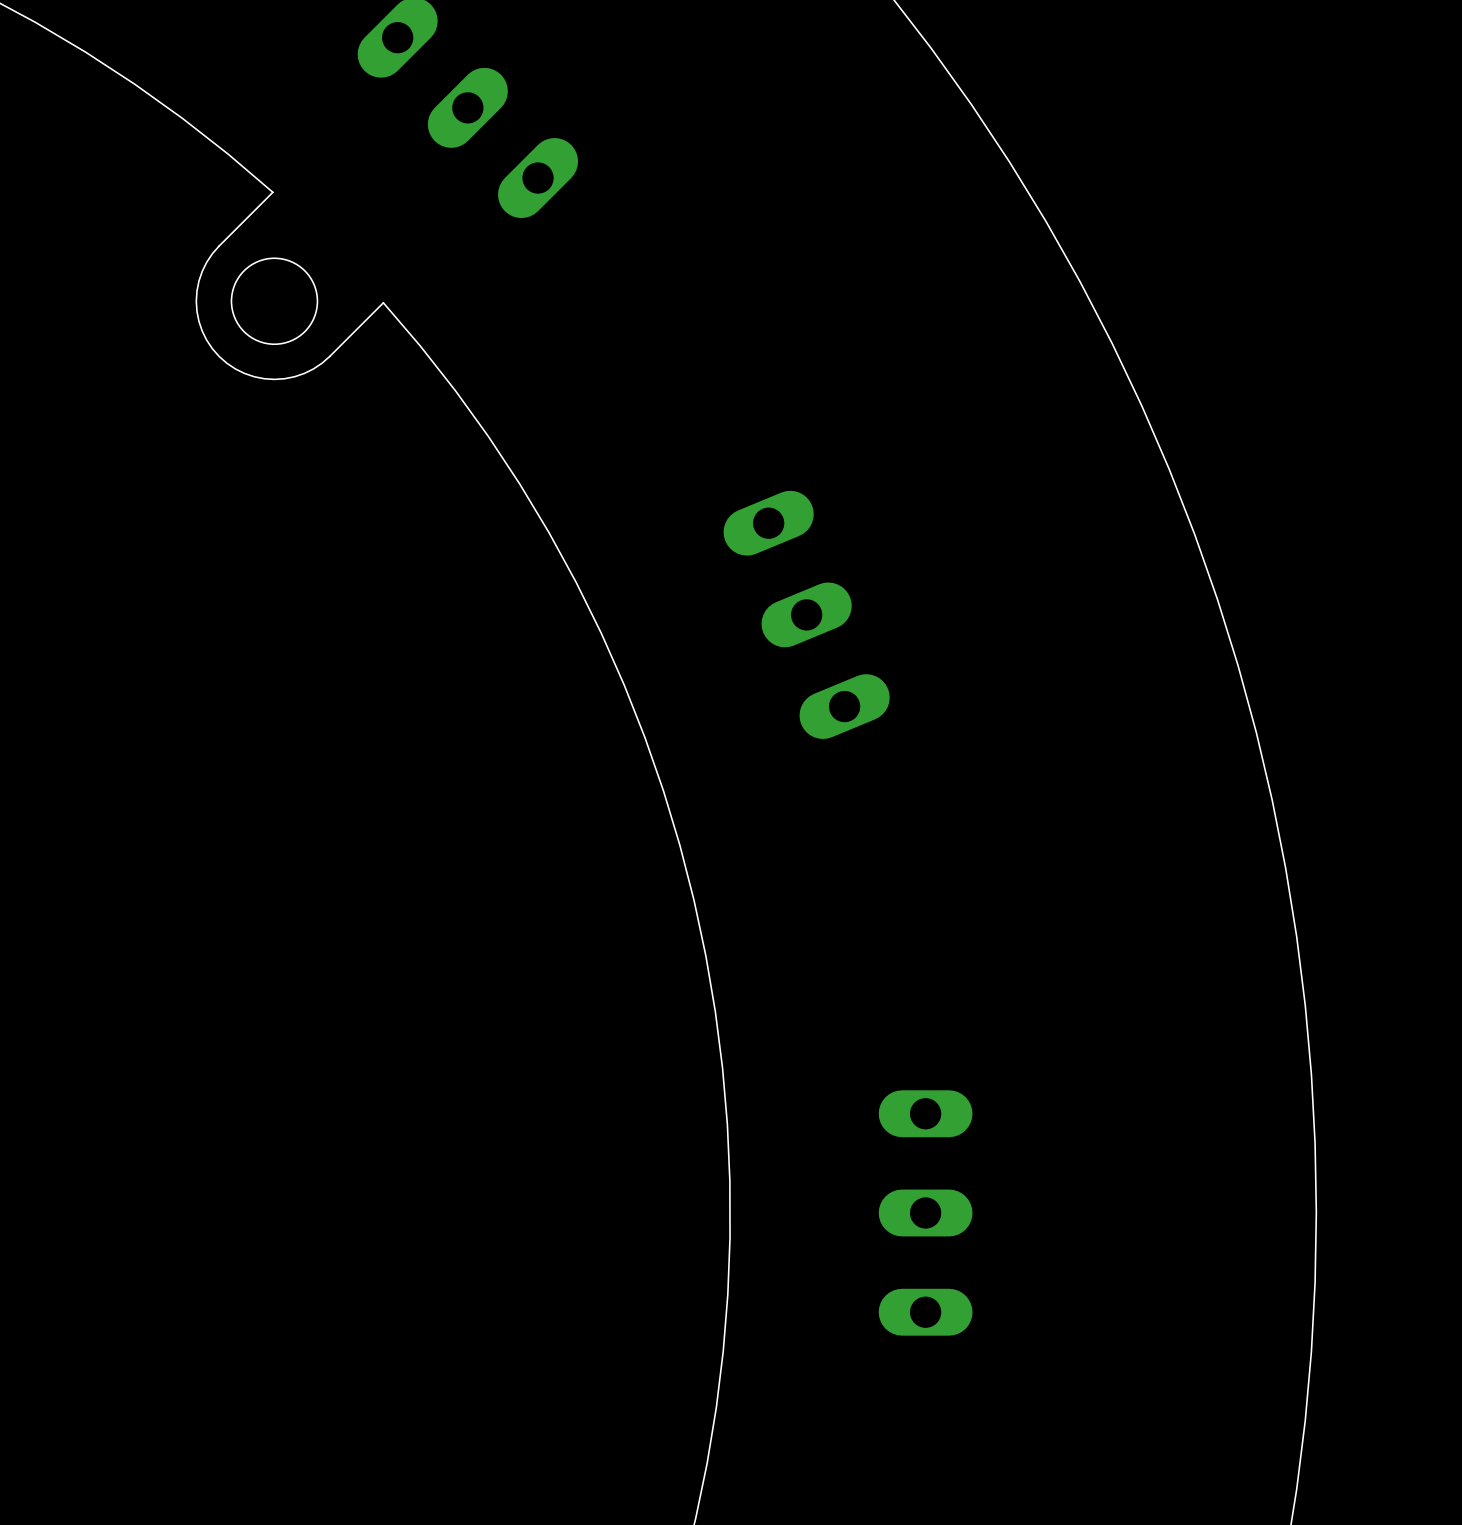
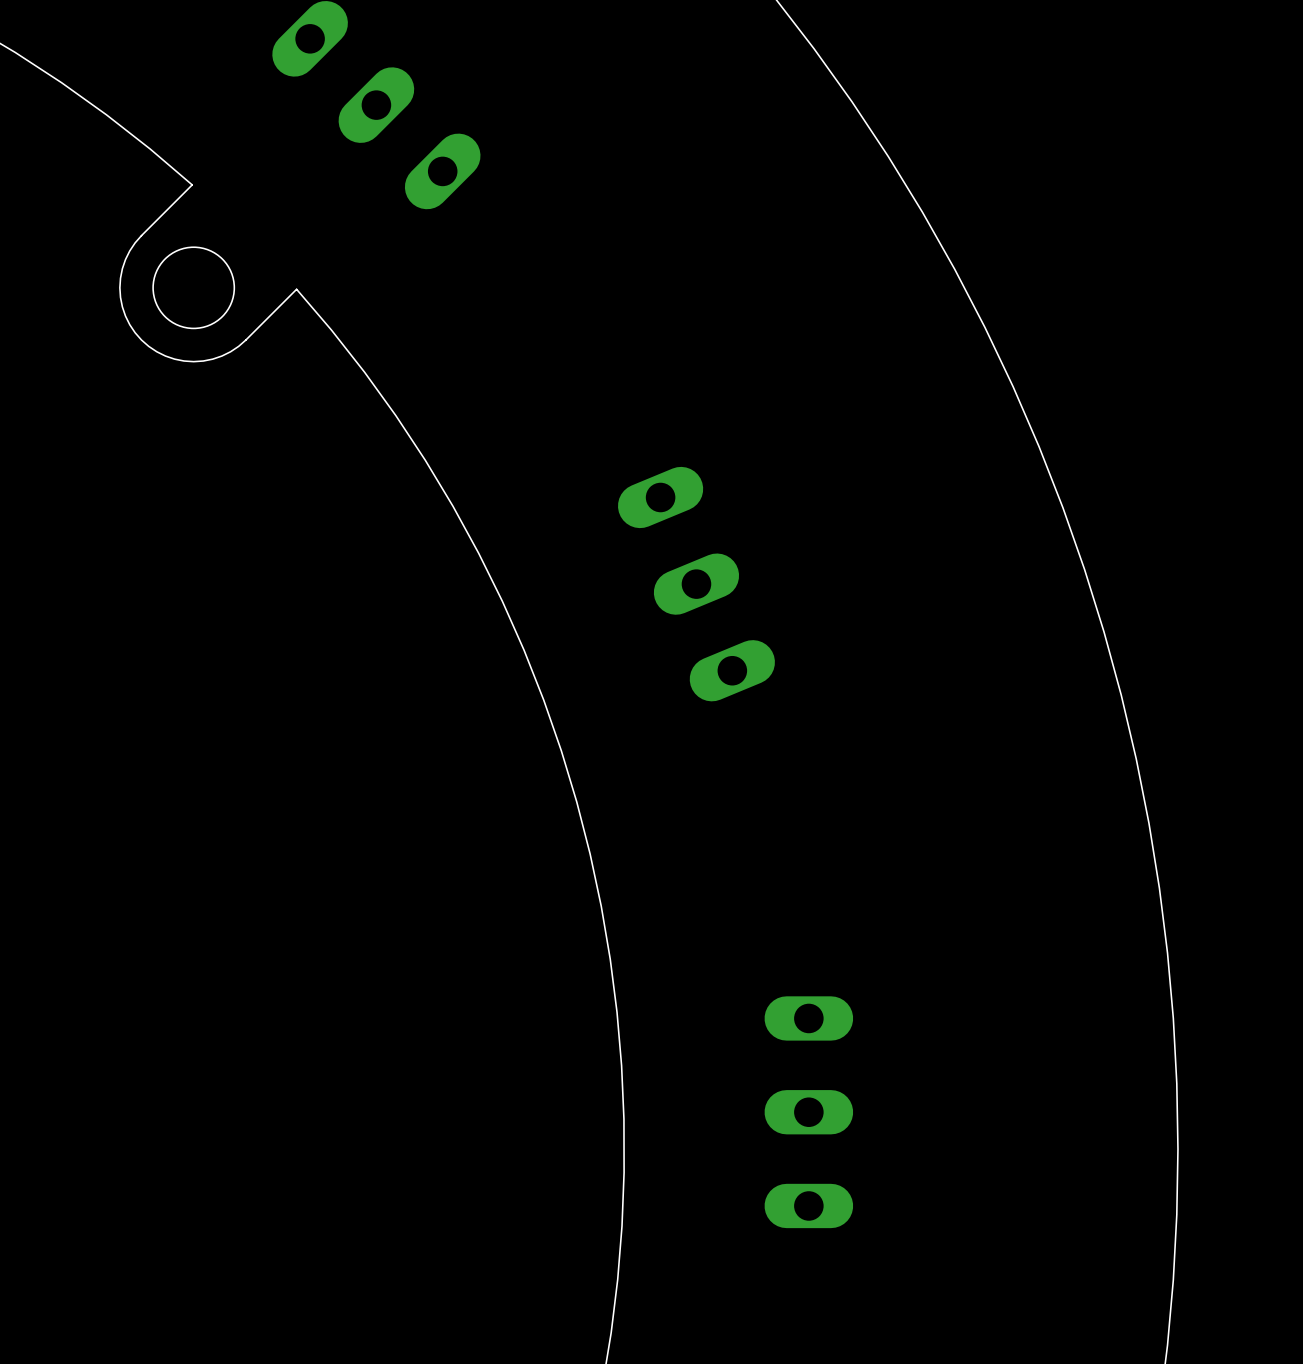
part position: (925, 1212) -> (808, 1112)

